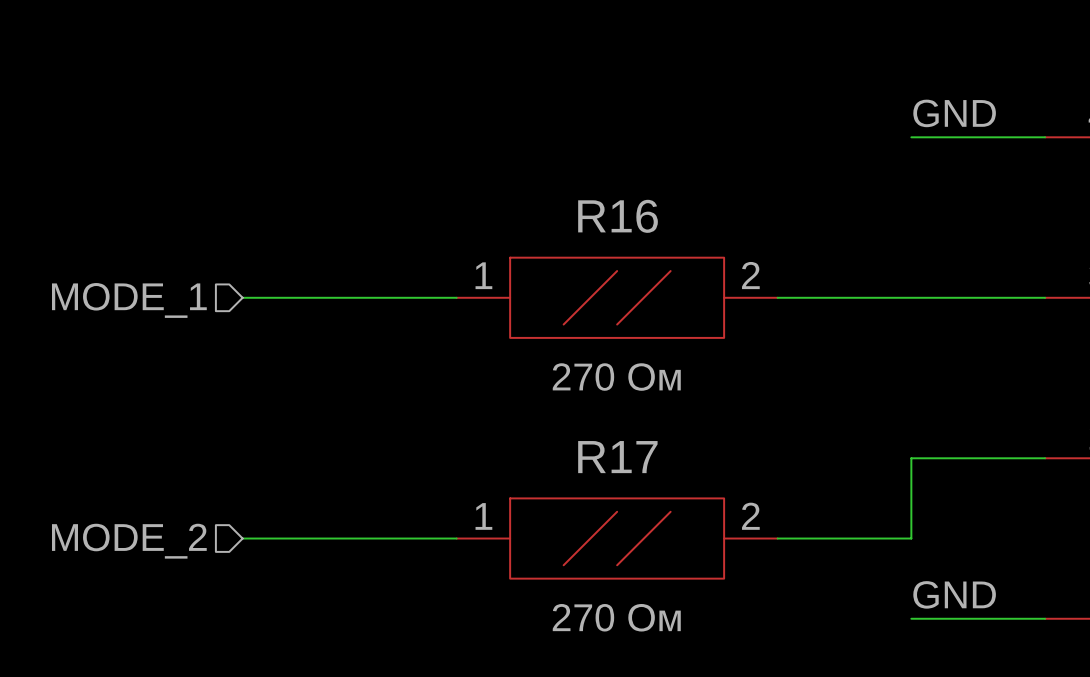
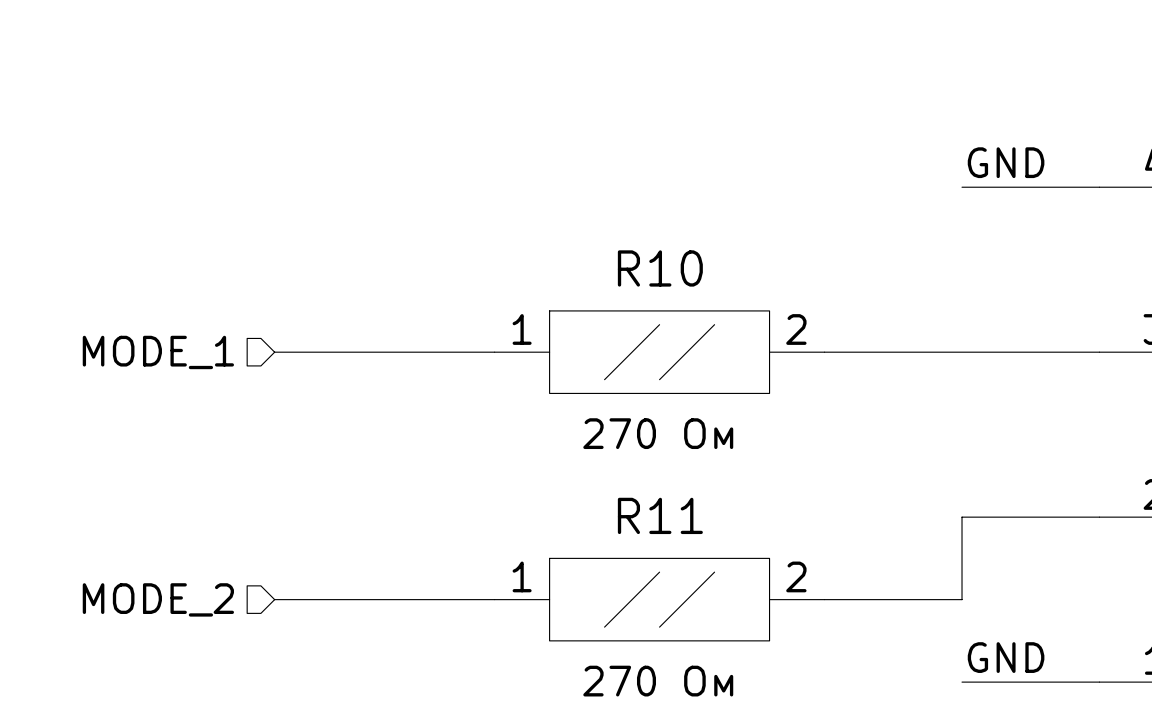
R16 name: R16 (618, 216) -> R10 (660, 268)
R17 name: R17 (617, 457) -> R11 (660, 515)

